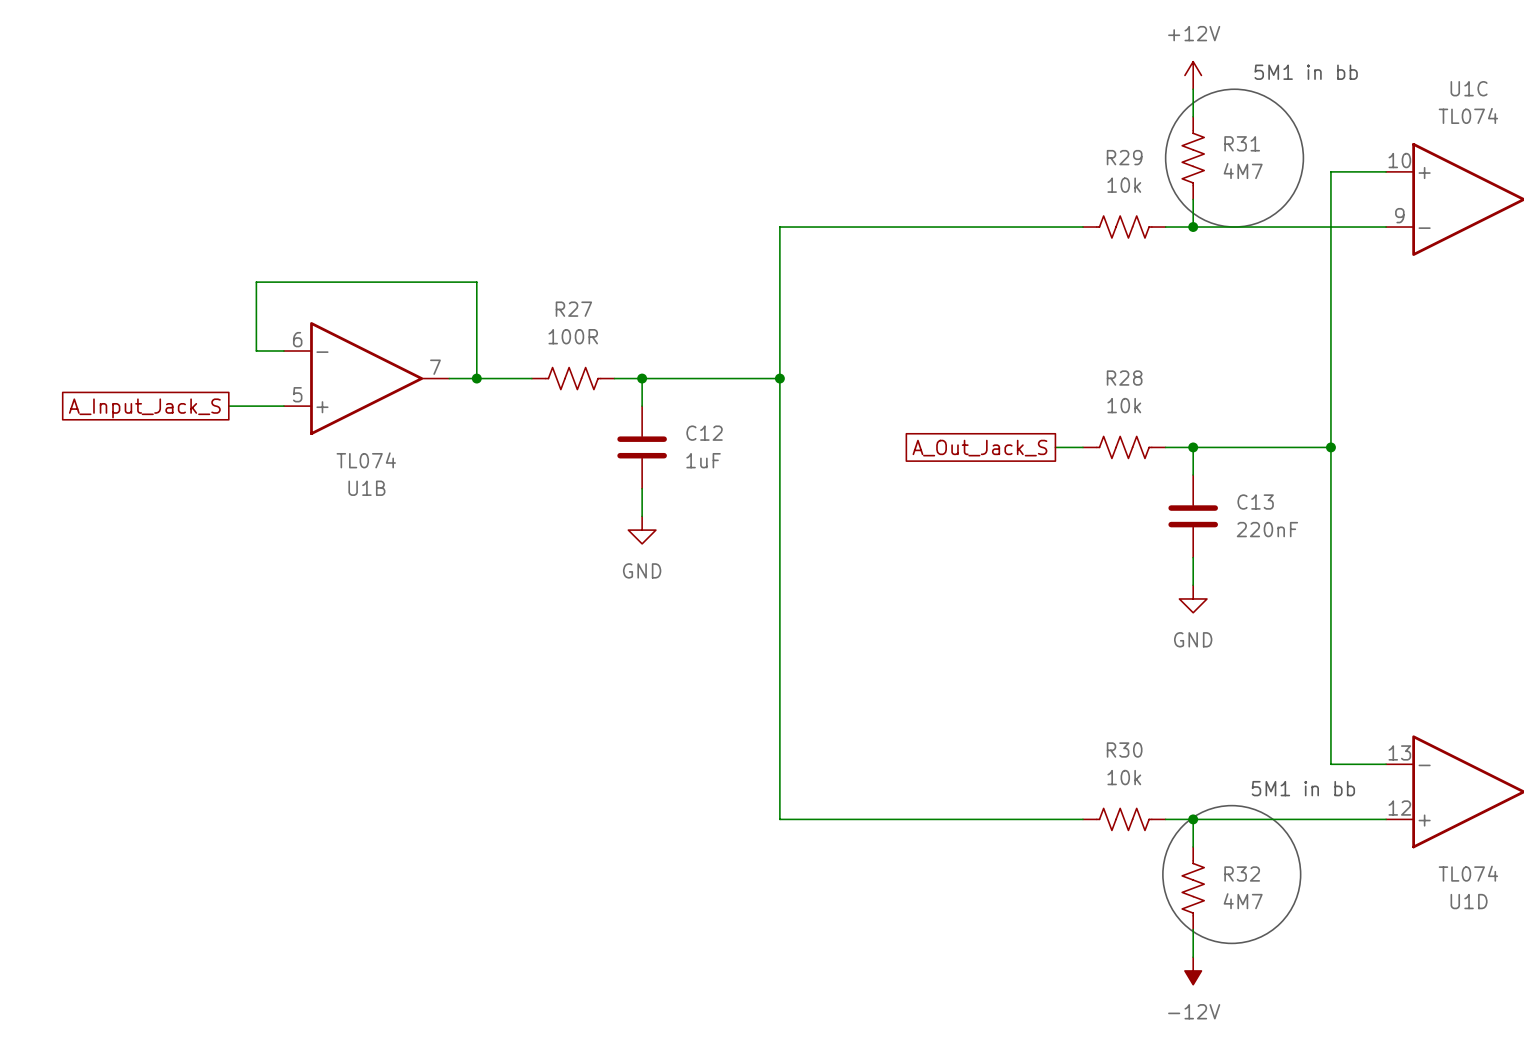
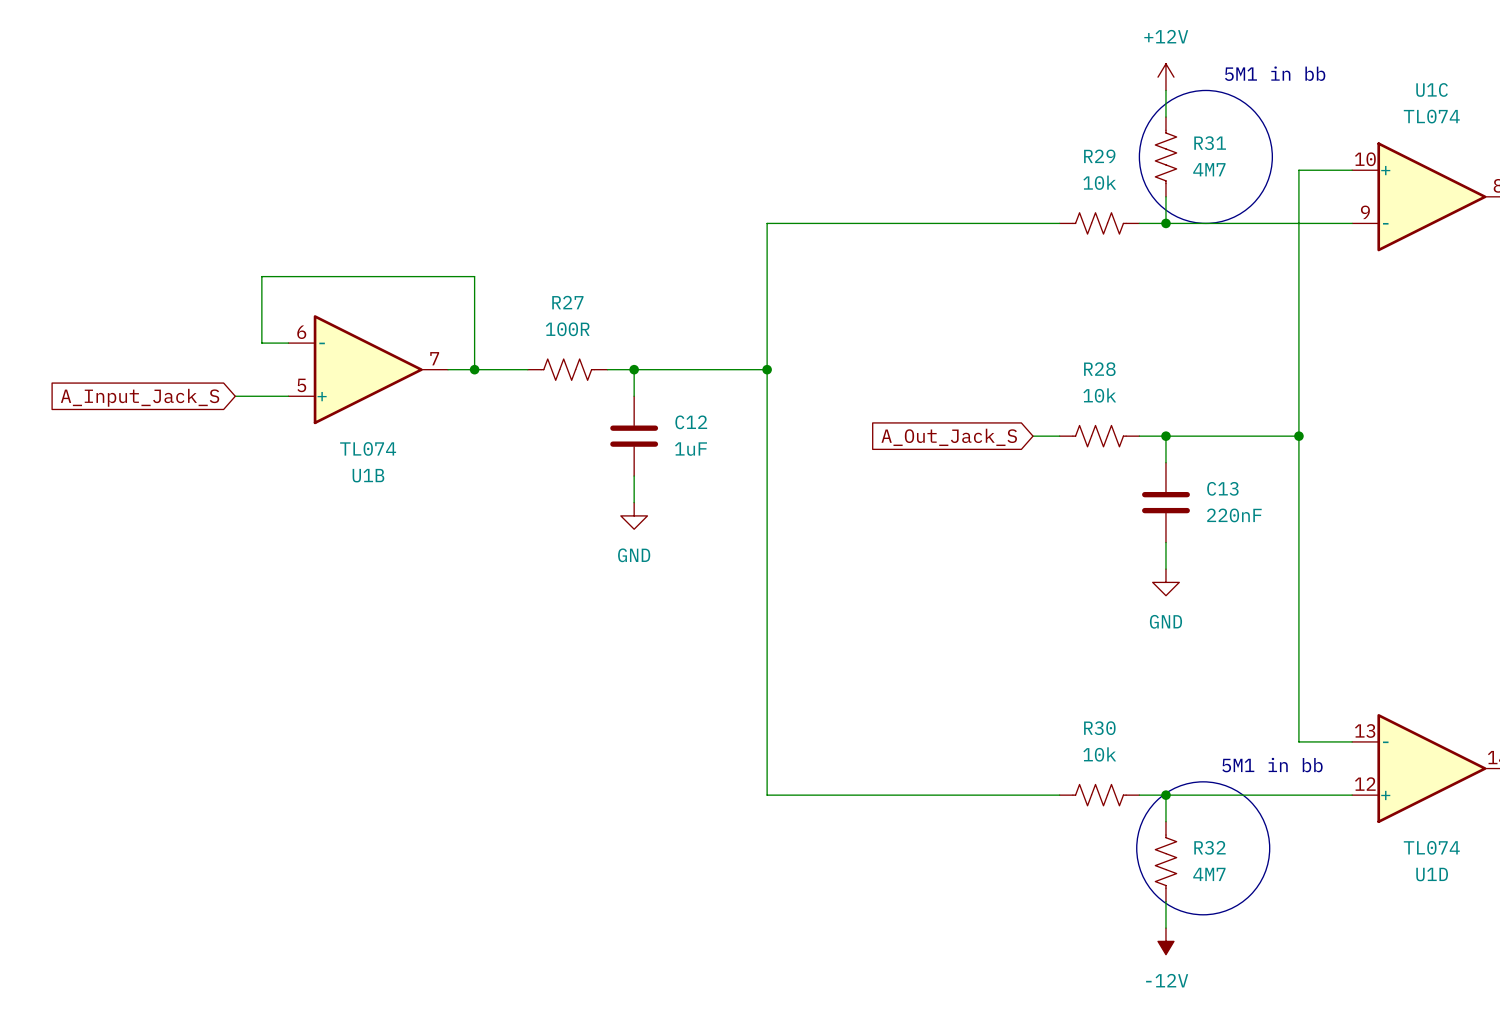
global label shape: passive (144, 408) -> input (140, 397)
global label shape: passive (979, 448) -> input (949, 437)

